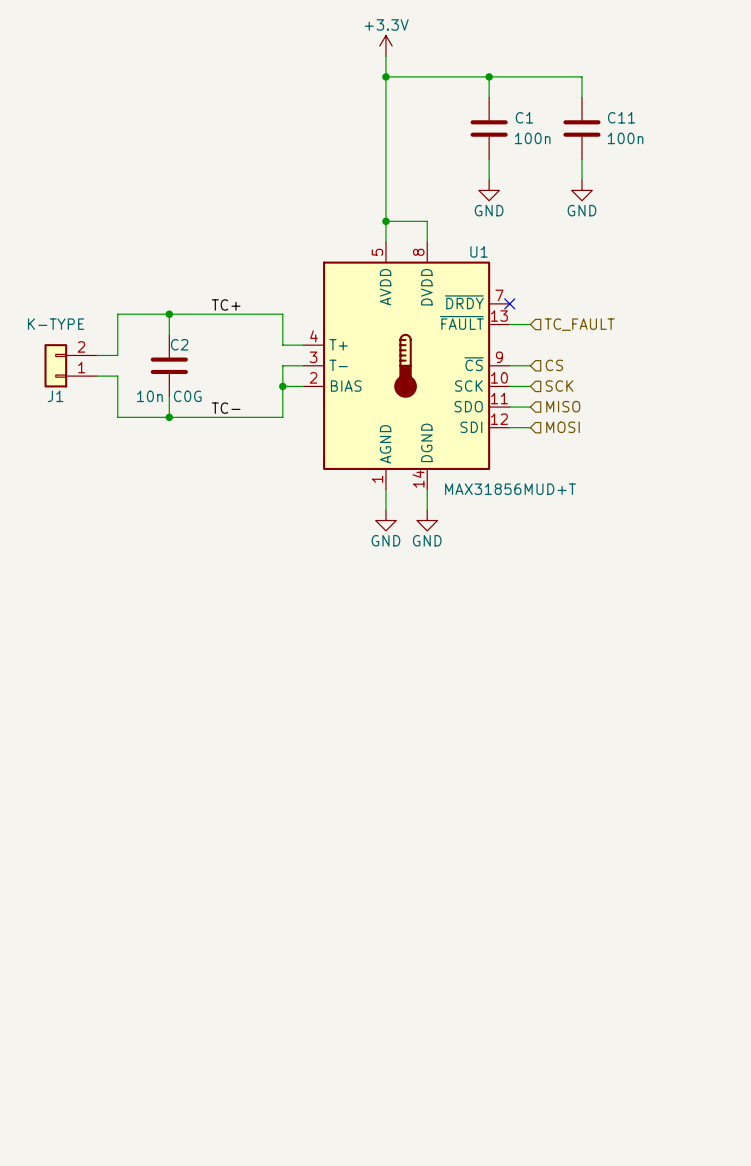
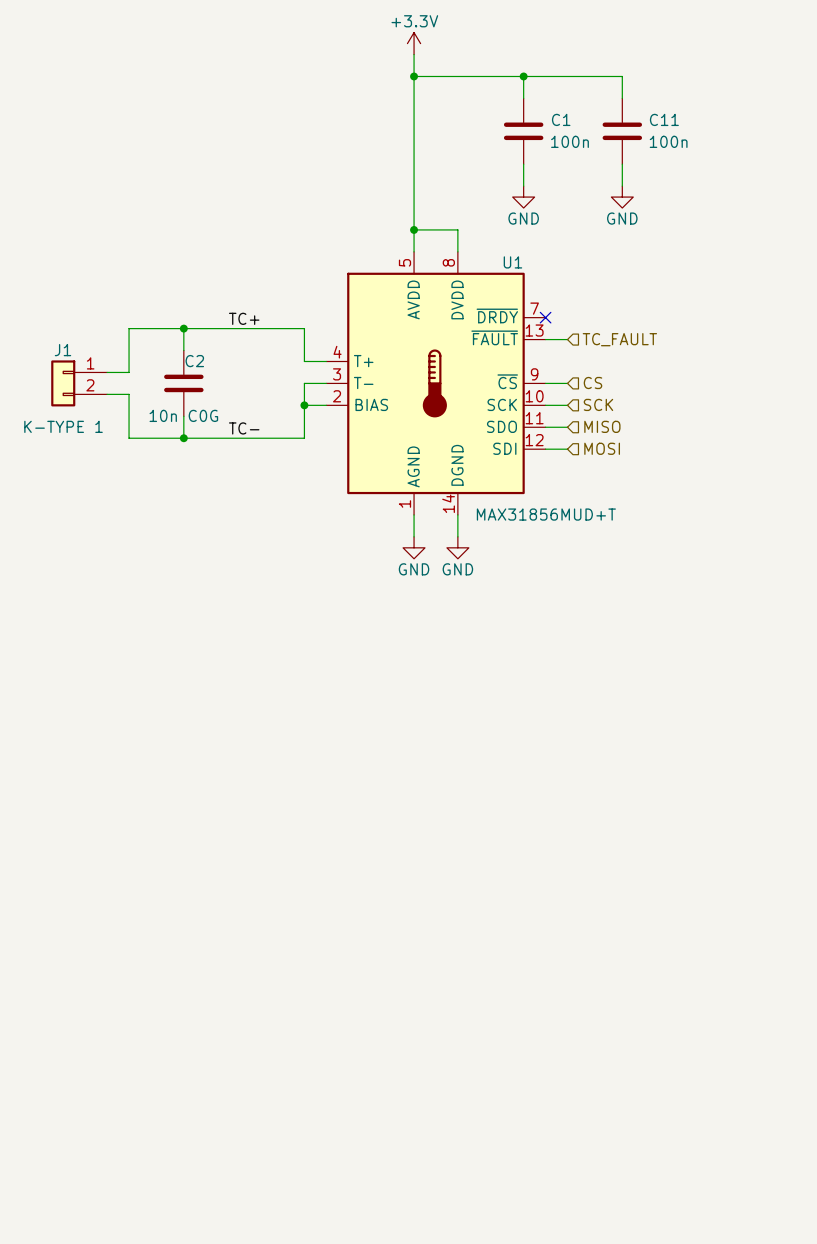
J1 value: K-TYPE (56, 324) -> K-TYPE 1 (63, 426)
J1 flip: as is (55, 365) -> up-down (63, 383)

